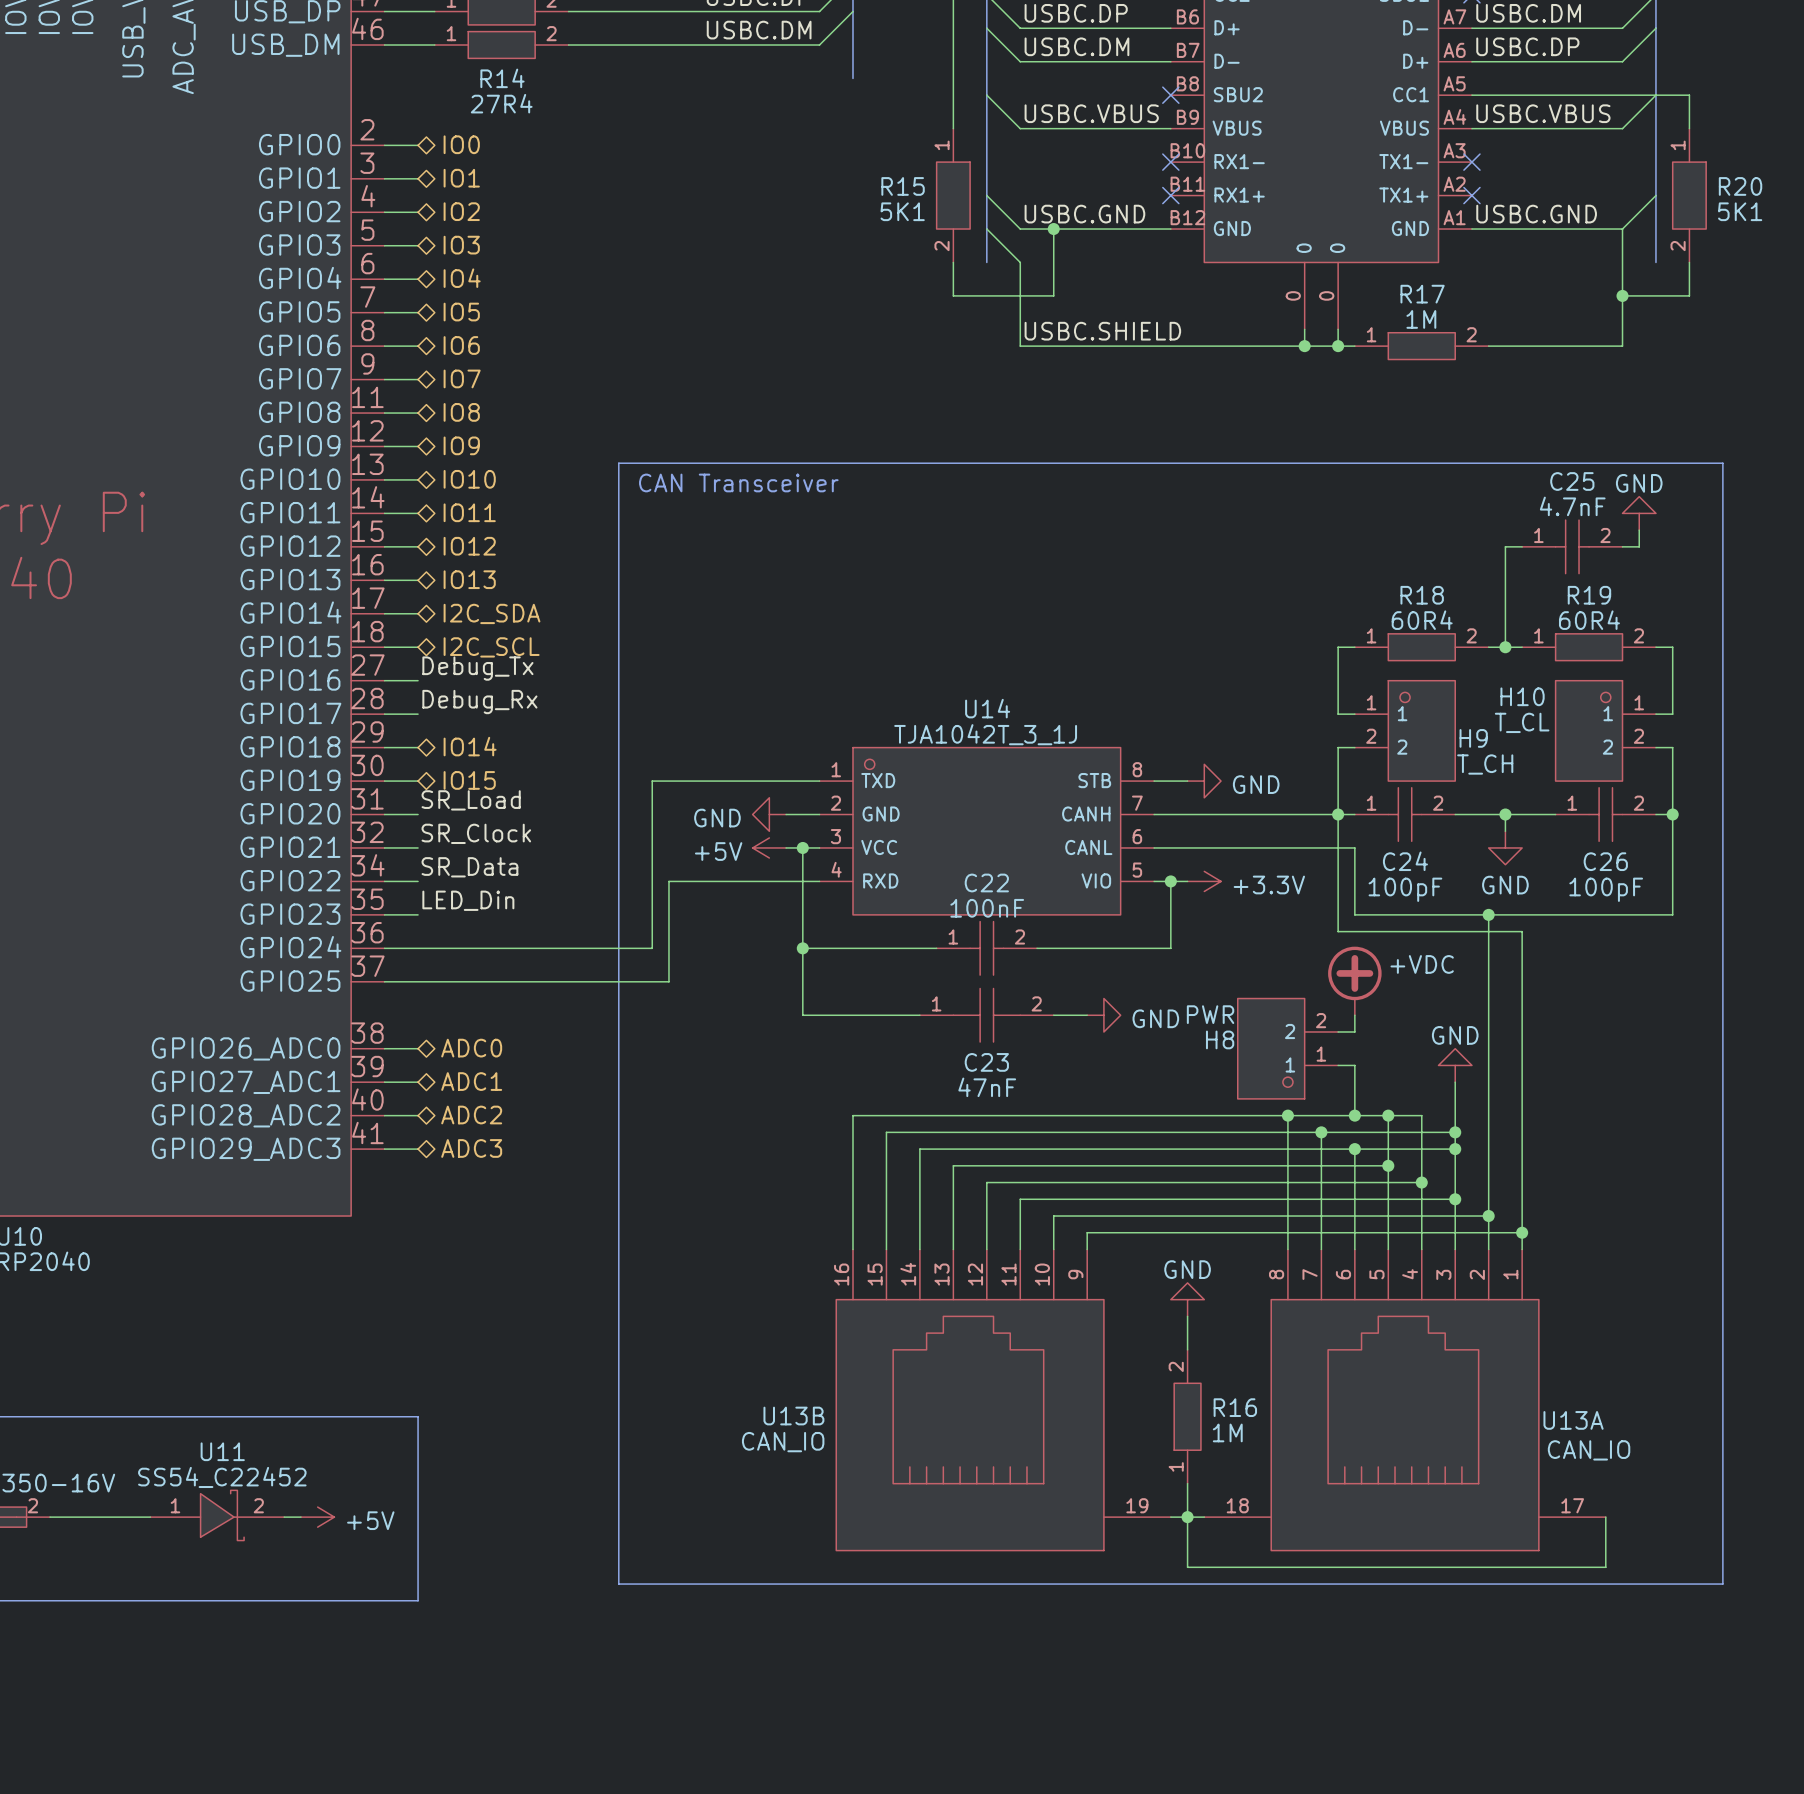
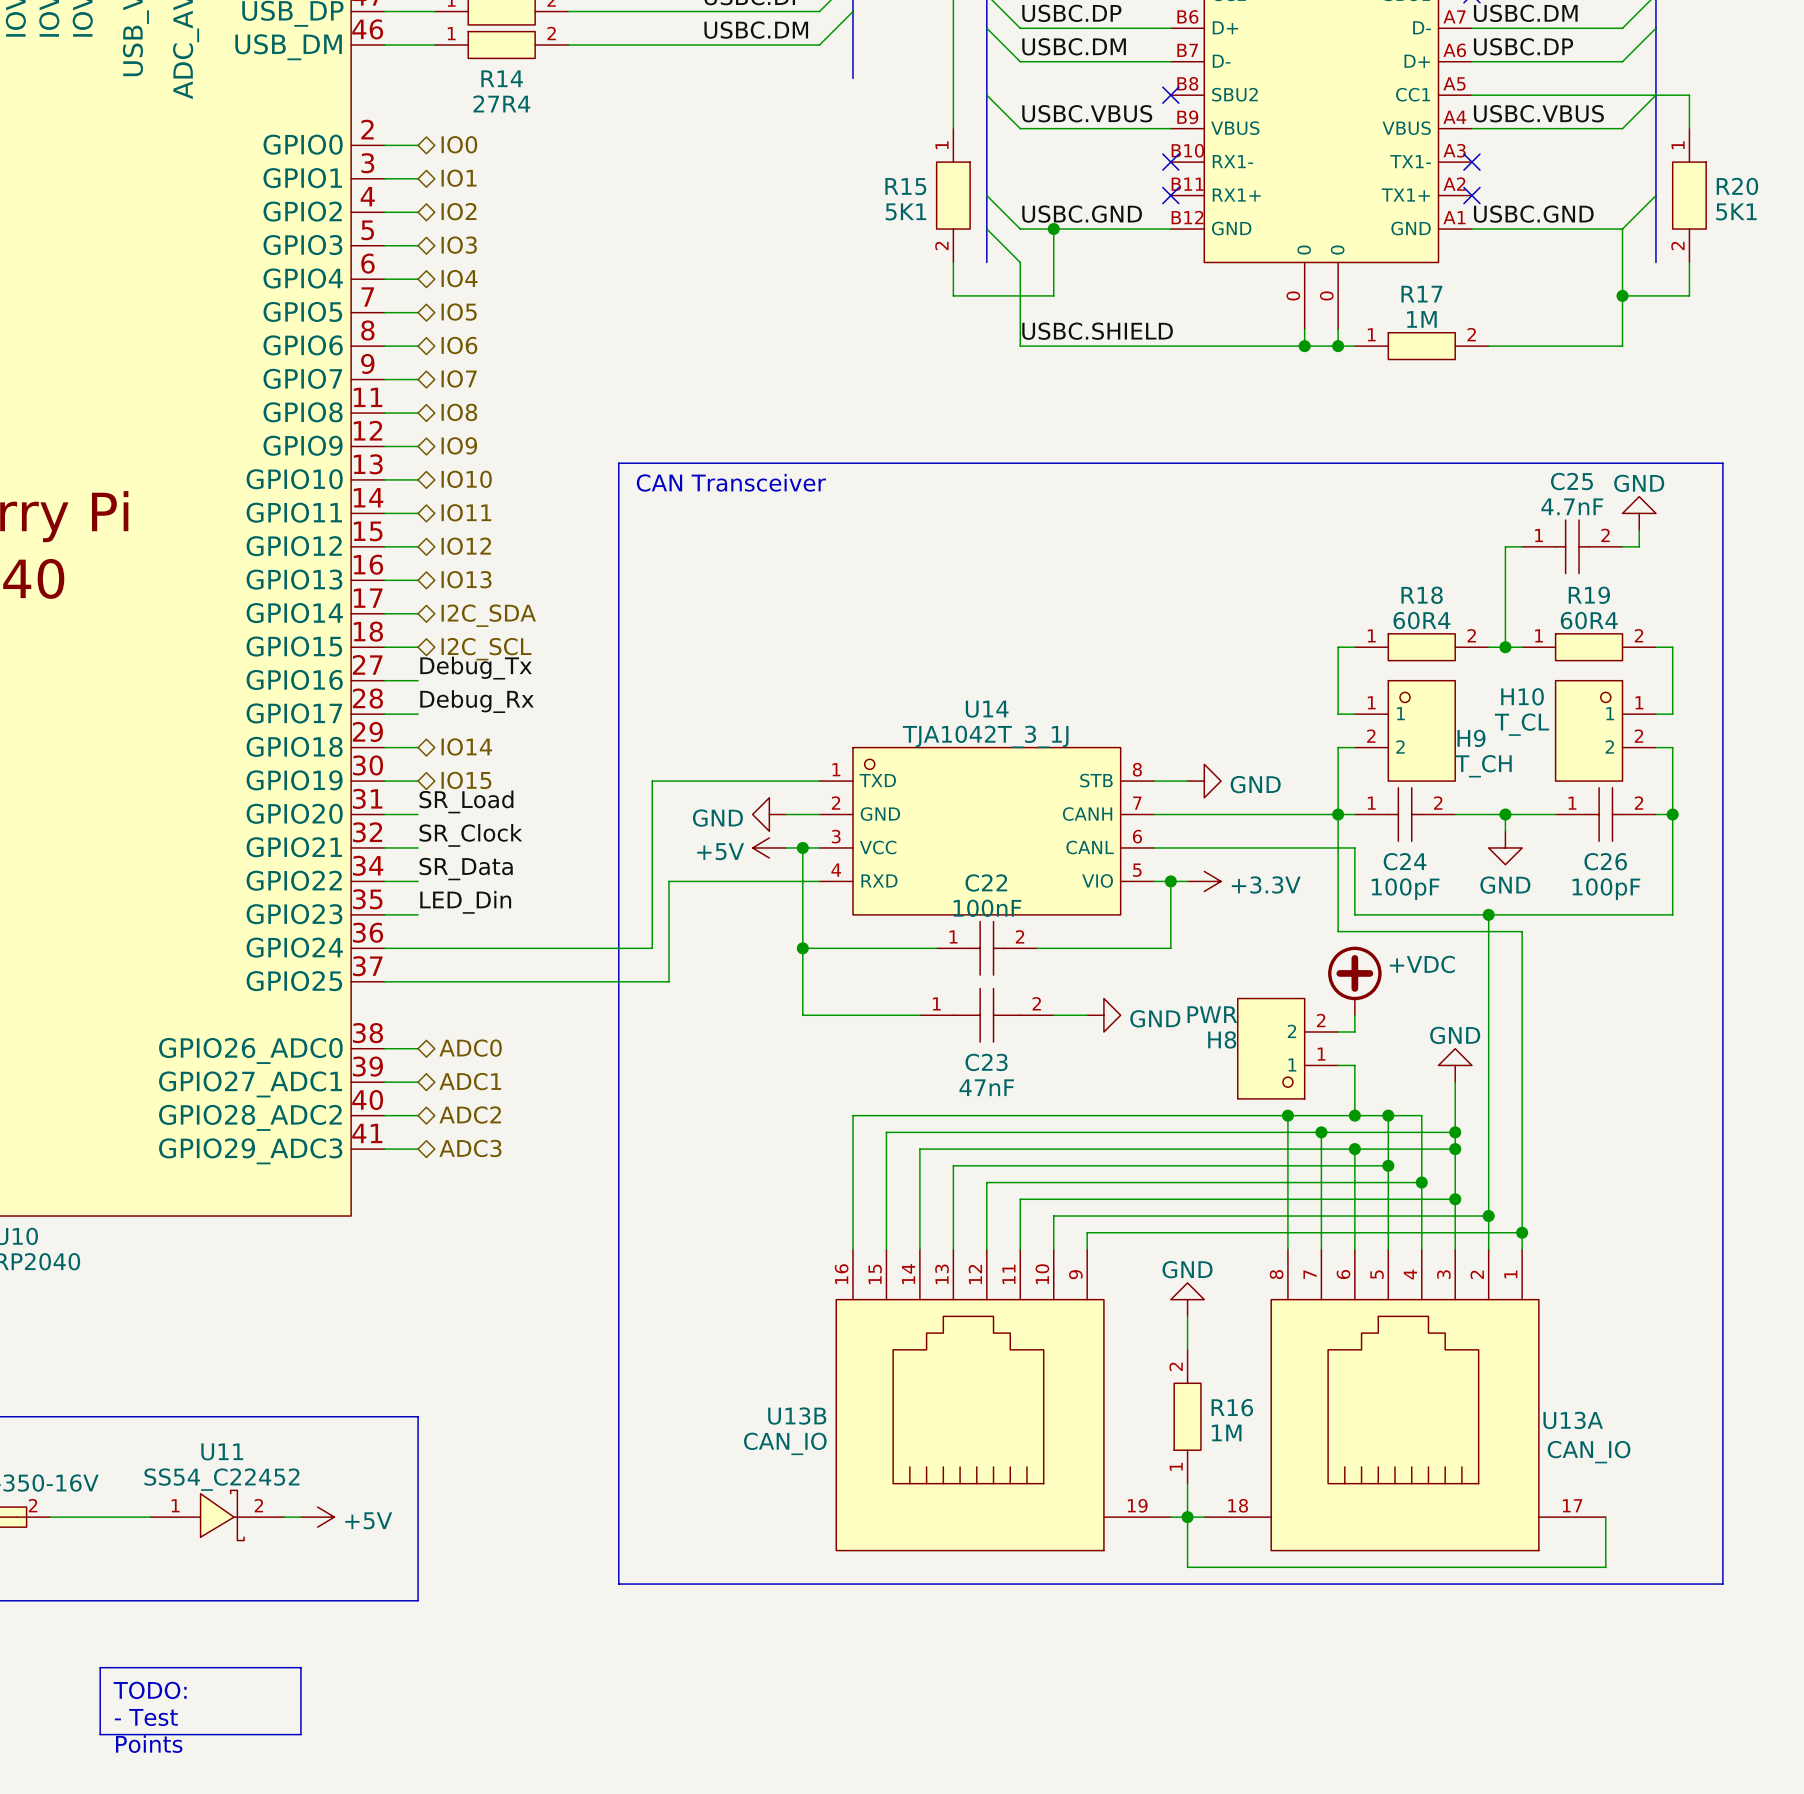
line: none -> (100, 1667) (300, 1667) (300, 1734) (100, 1734) (100, 1667)
text: none -> TODO: (150, 1690)
text: none -> - Test (146, 1717)
text: none -> Points (149, 1744)

